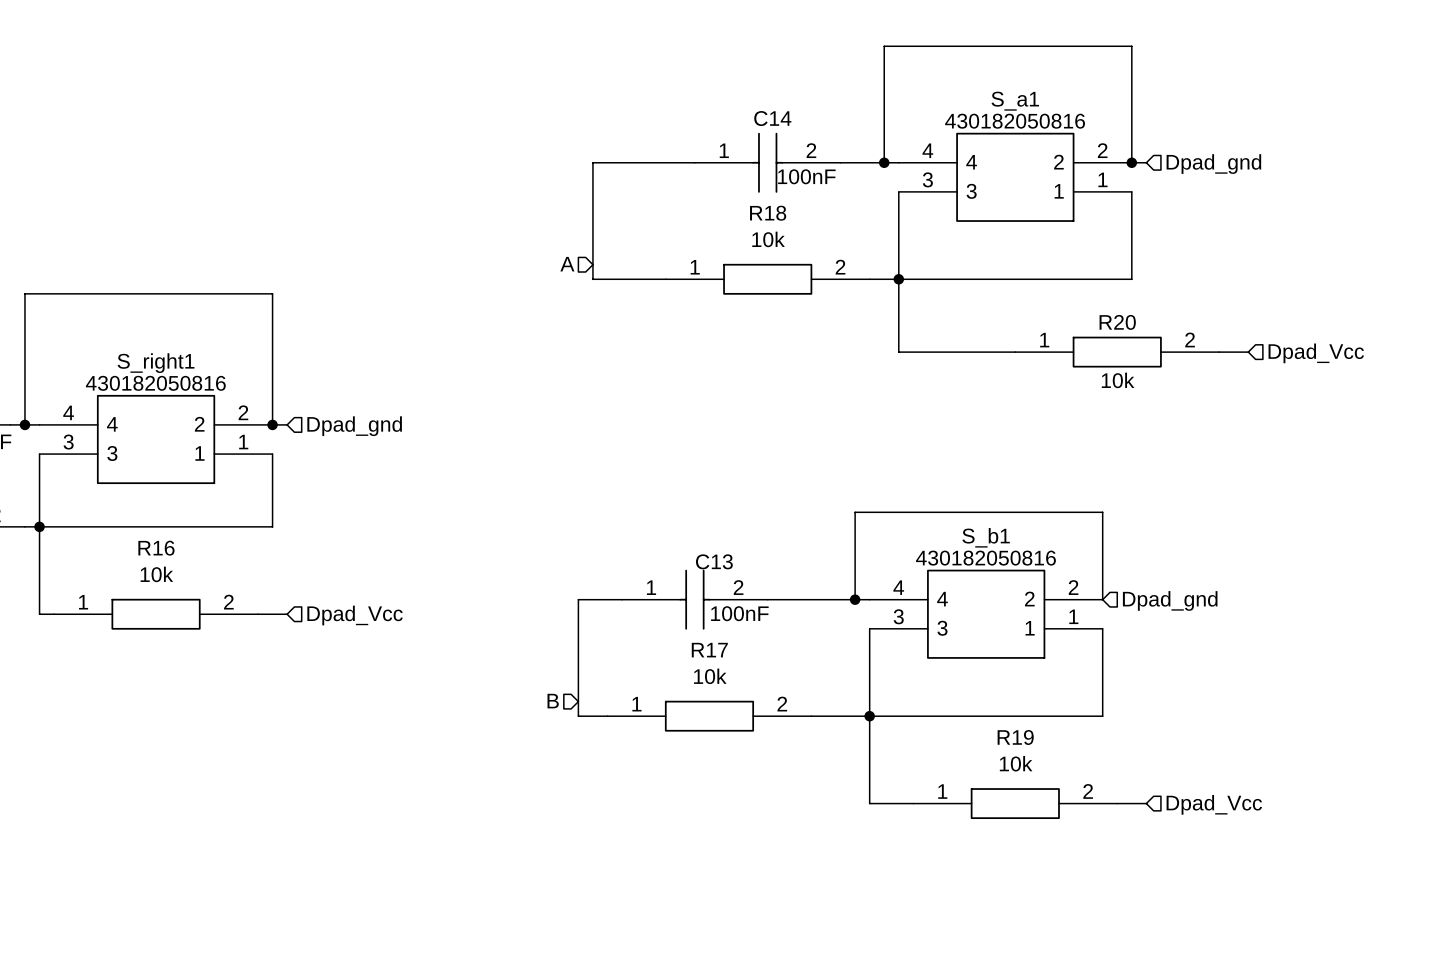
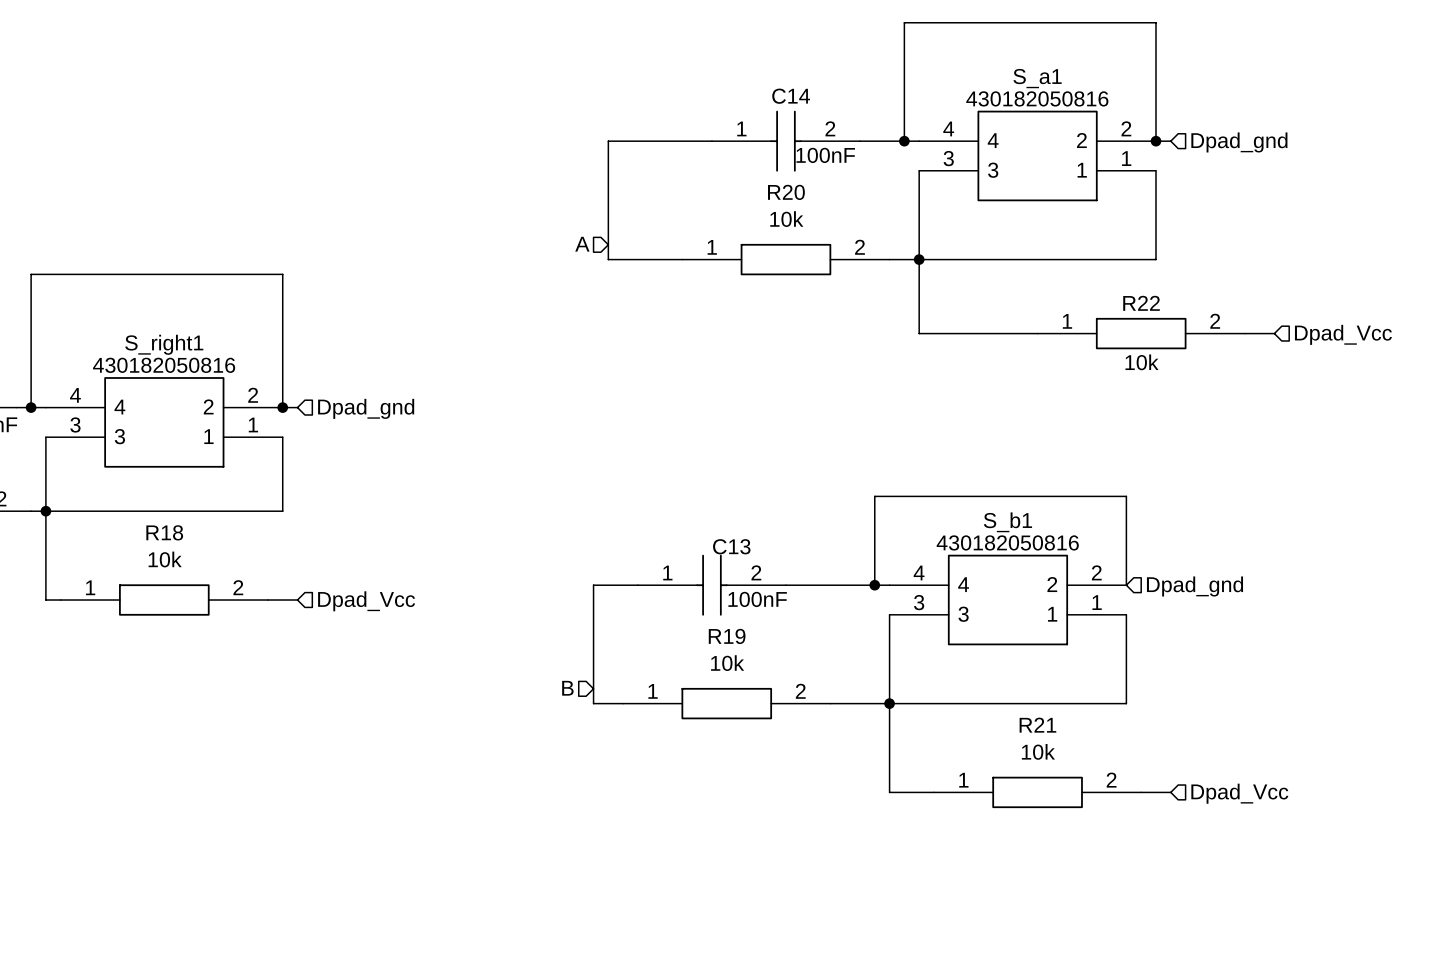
R18 name: R18 (768, 213) -> R20 (786, 192)
R20 name: R20 (1117, 322) -> R22 (1141, 303)
R16 name: R16 (156, 548) -> R18 (164, 532)
R17 name: R17 (709, 650) -> R19 (727, 636)
R19 name: R19 (1015, 737) -> R21 (1037, 725)

